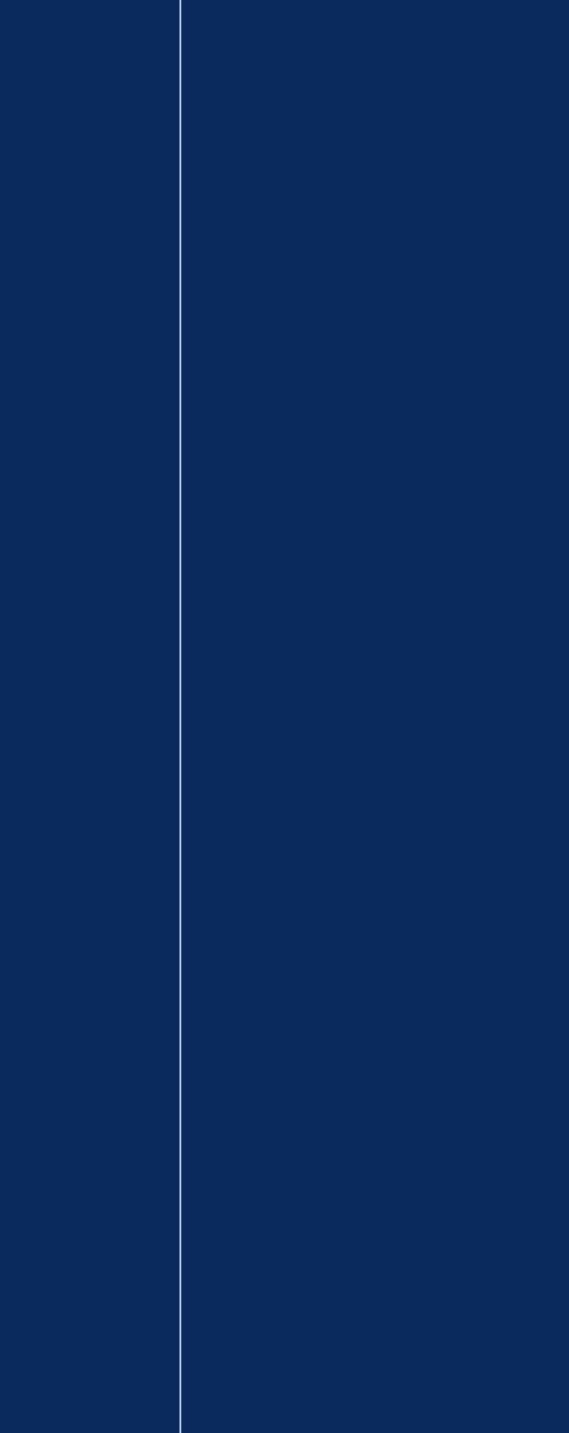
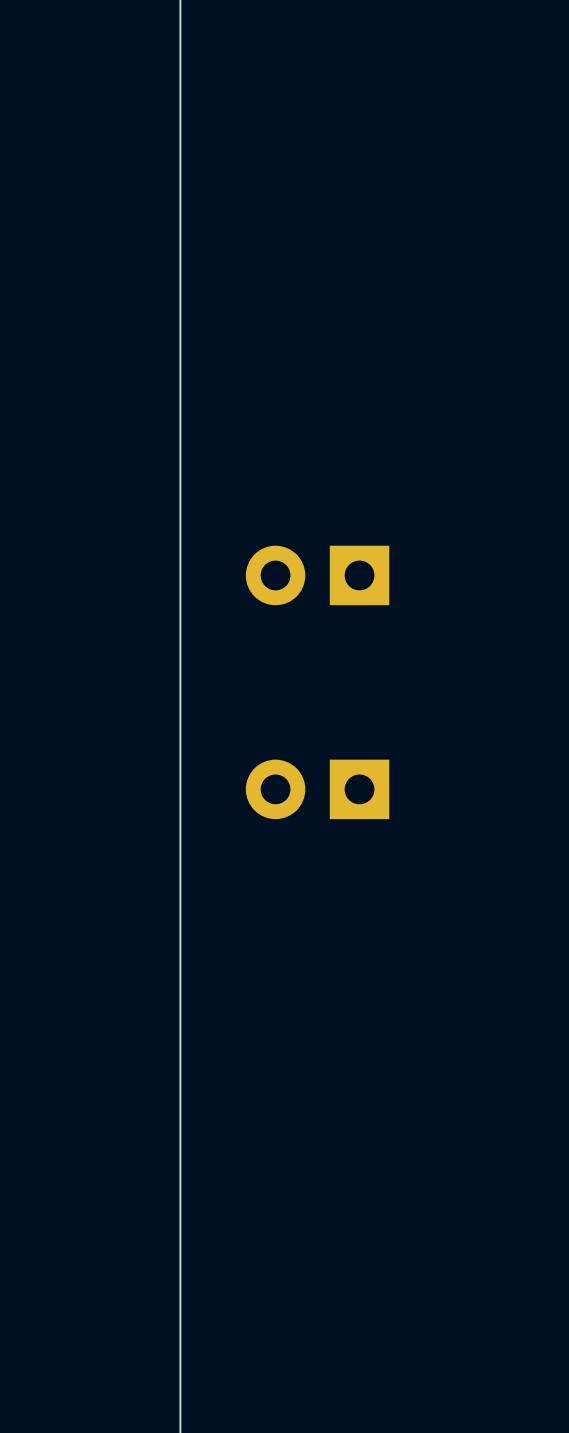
part: none -> (317, 575)
part: none -> (317, 789)

